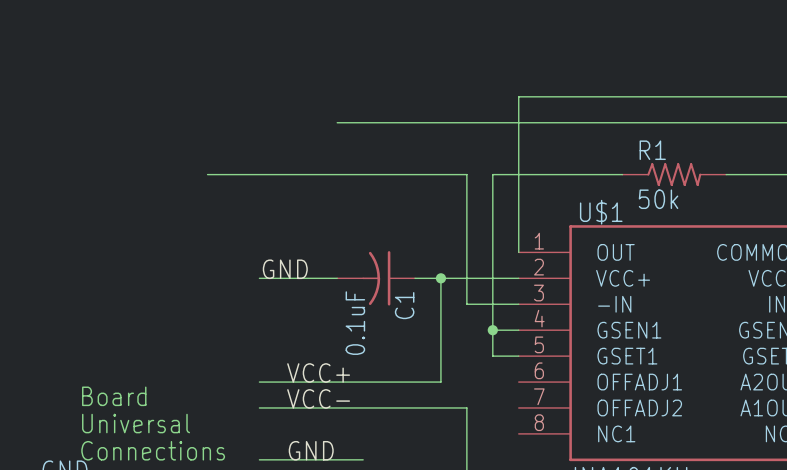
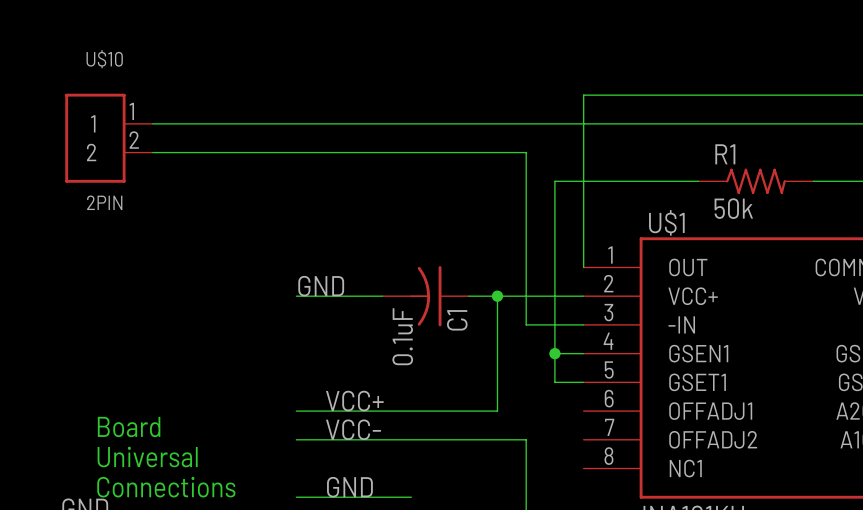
wire: none -> (152, 123) (382, 123)
U$10: none -> 2PIN (109, 138)
wire: (207, 174) (466, 174) -> (152, 152) (526, 152) (526, 181)

